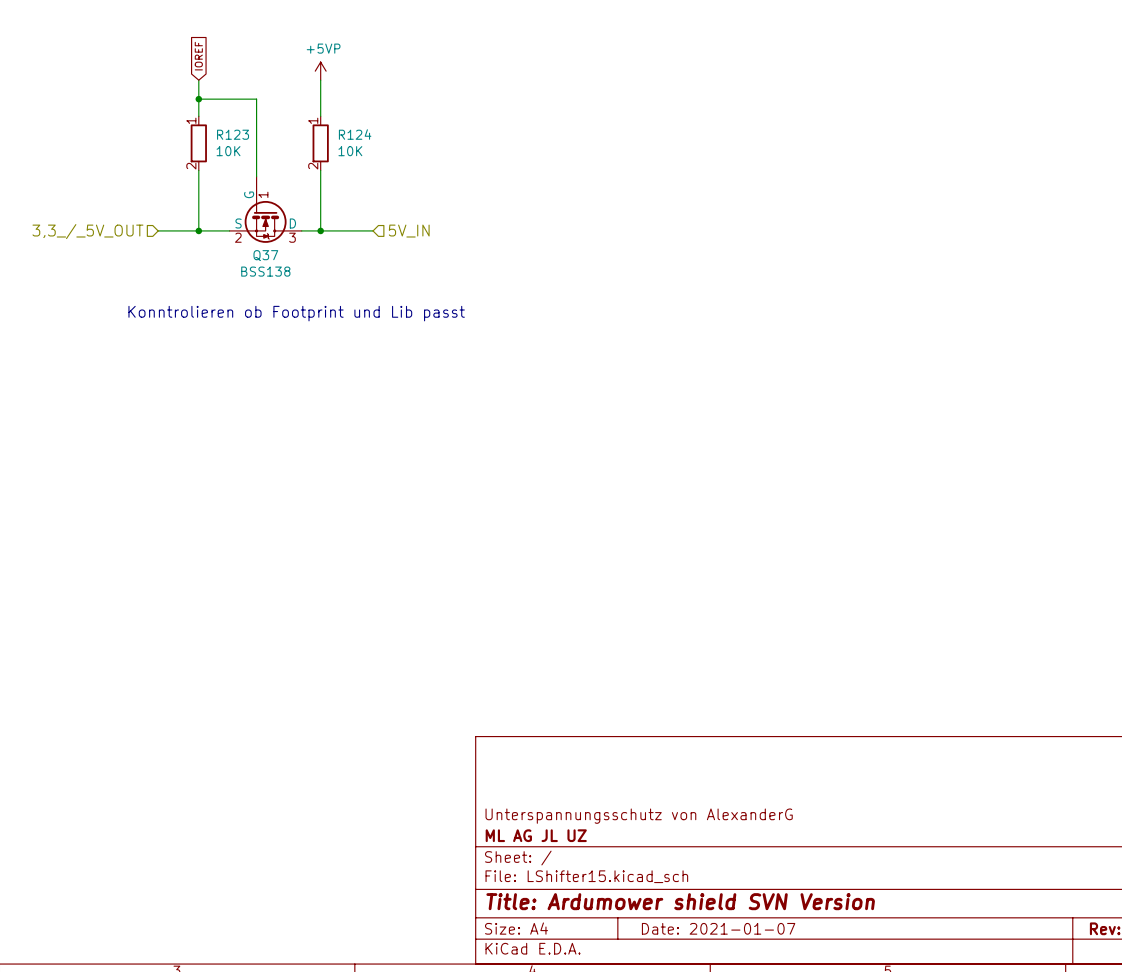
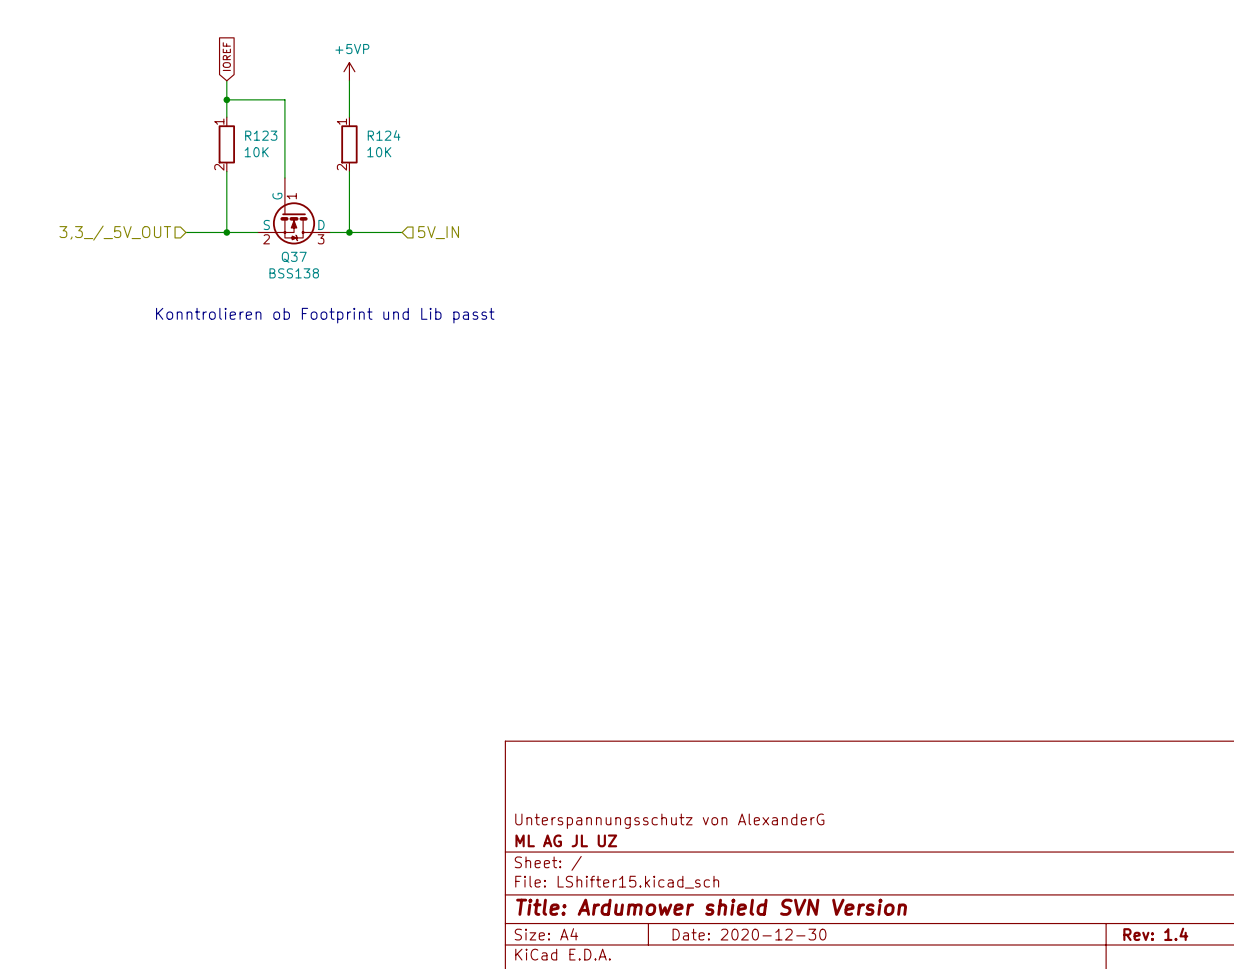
title block: Date: 2021-01-07 (718, 928) -> Date: 2020-12-30 (749, 934)

